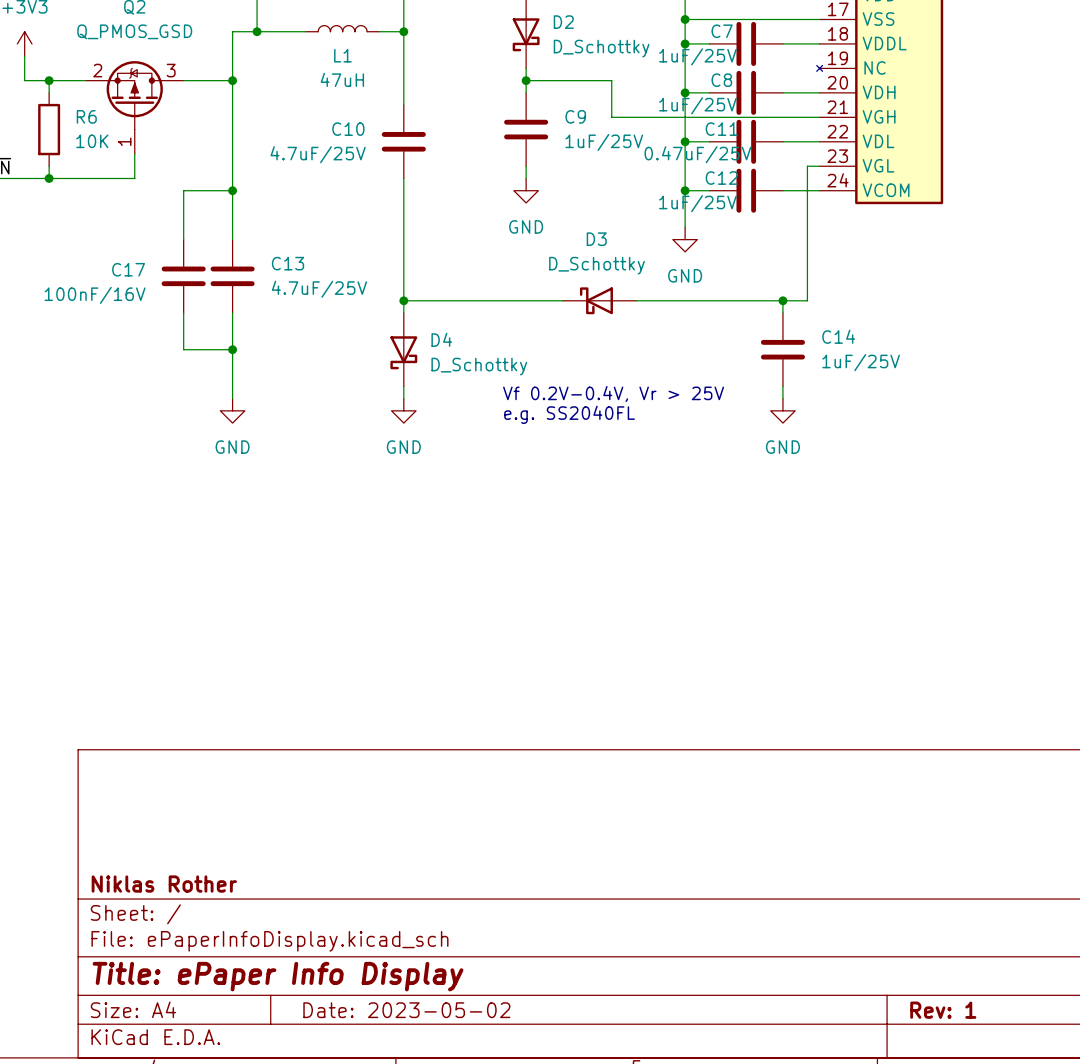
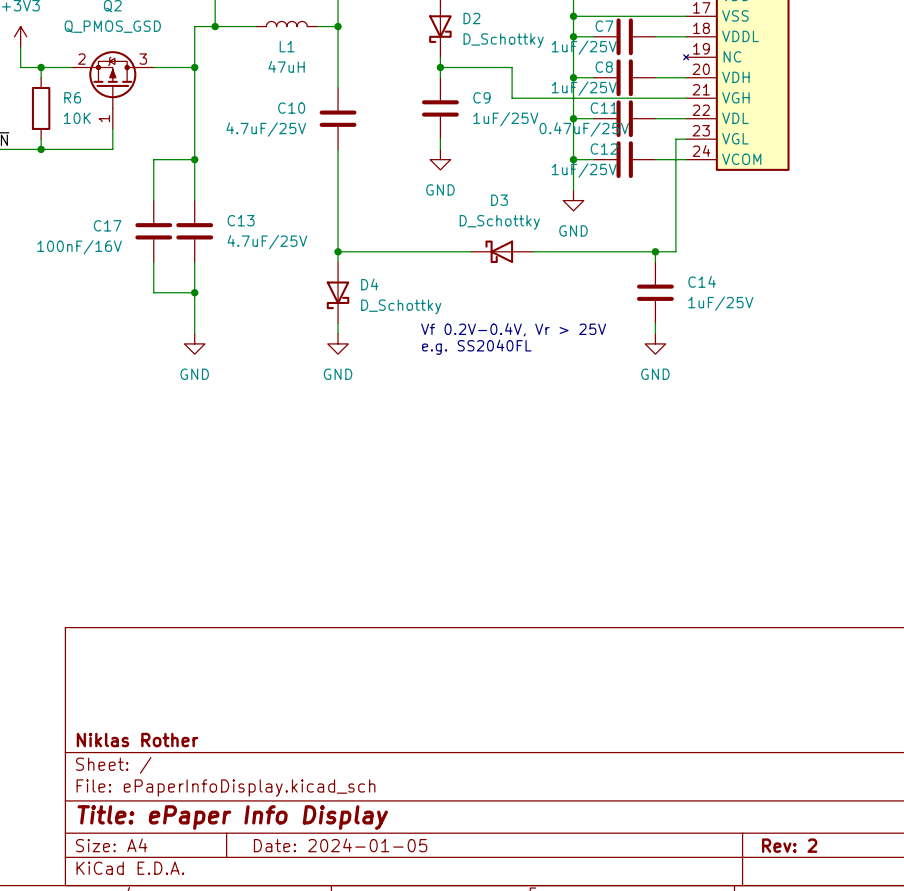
title block: Date: 2023-05-02 (406, 1010) -> Date: 2024-01-05 (340, 845)
title block: Rev: 1 (943, 1010) -> Rev: 2 (789, 845)

